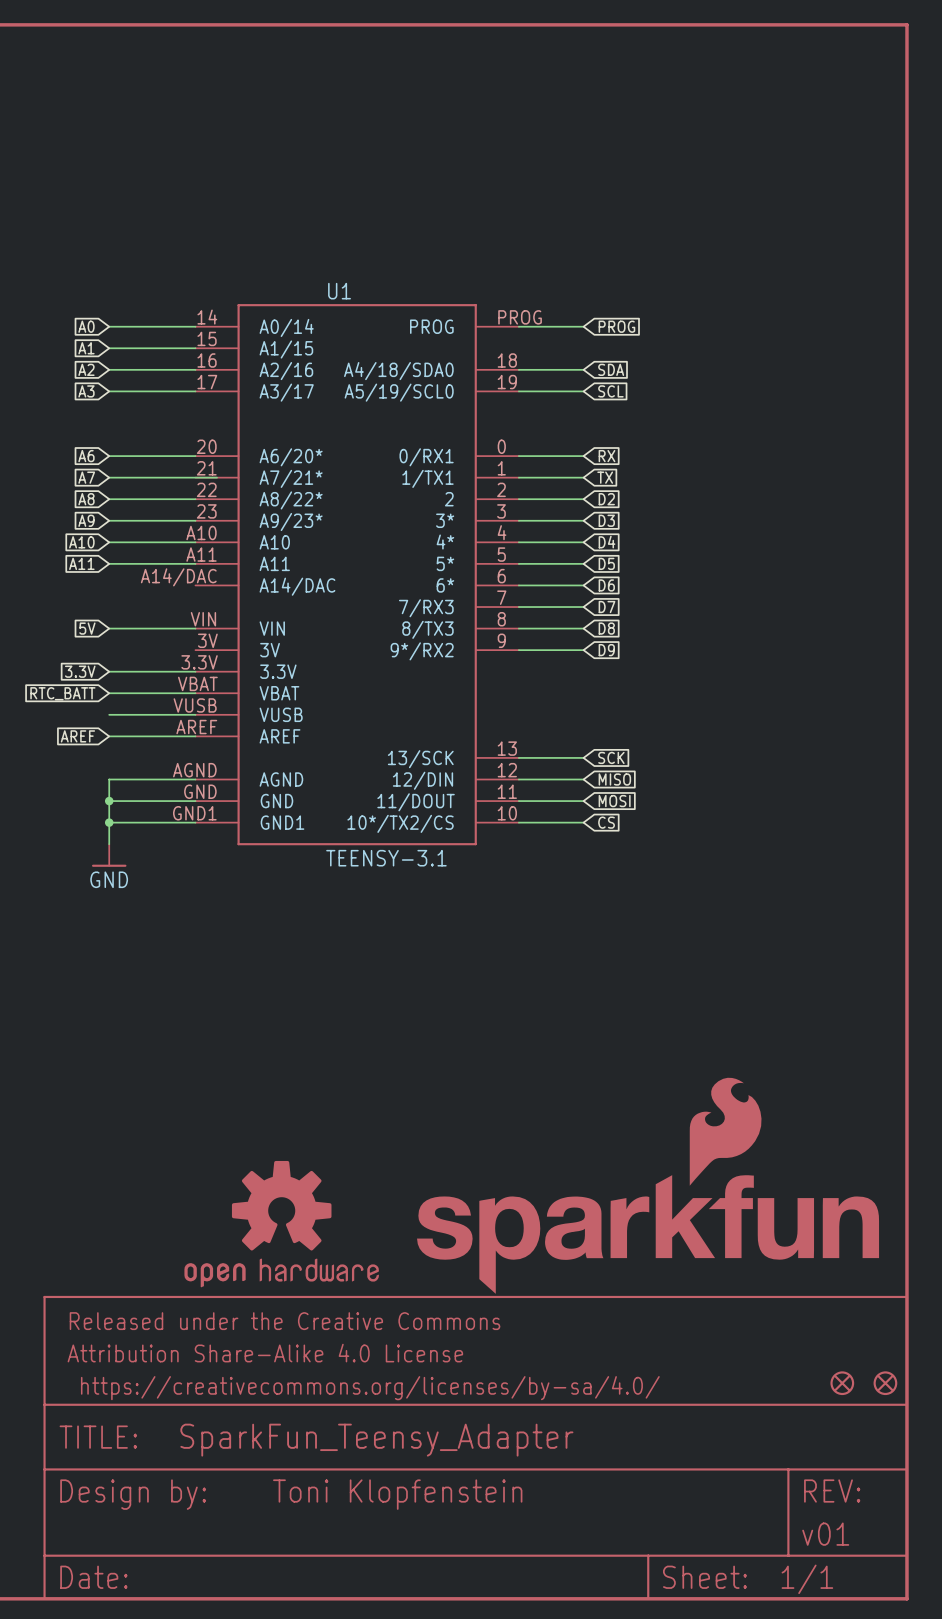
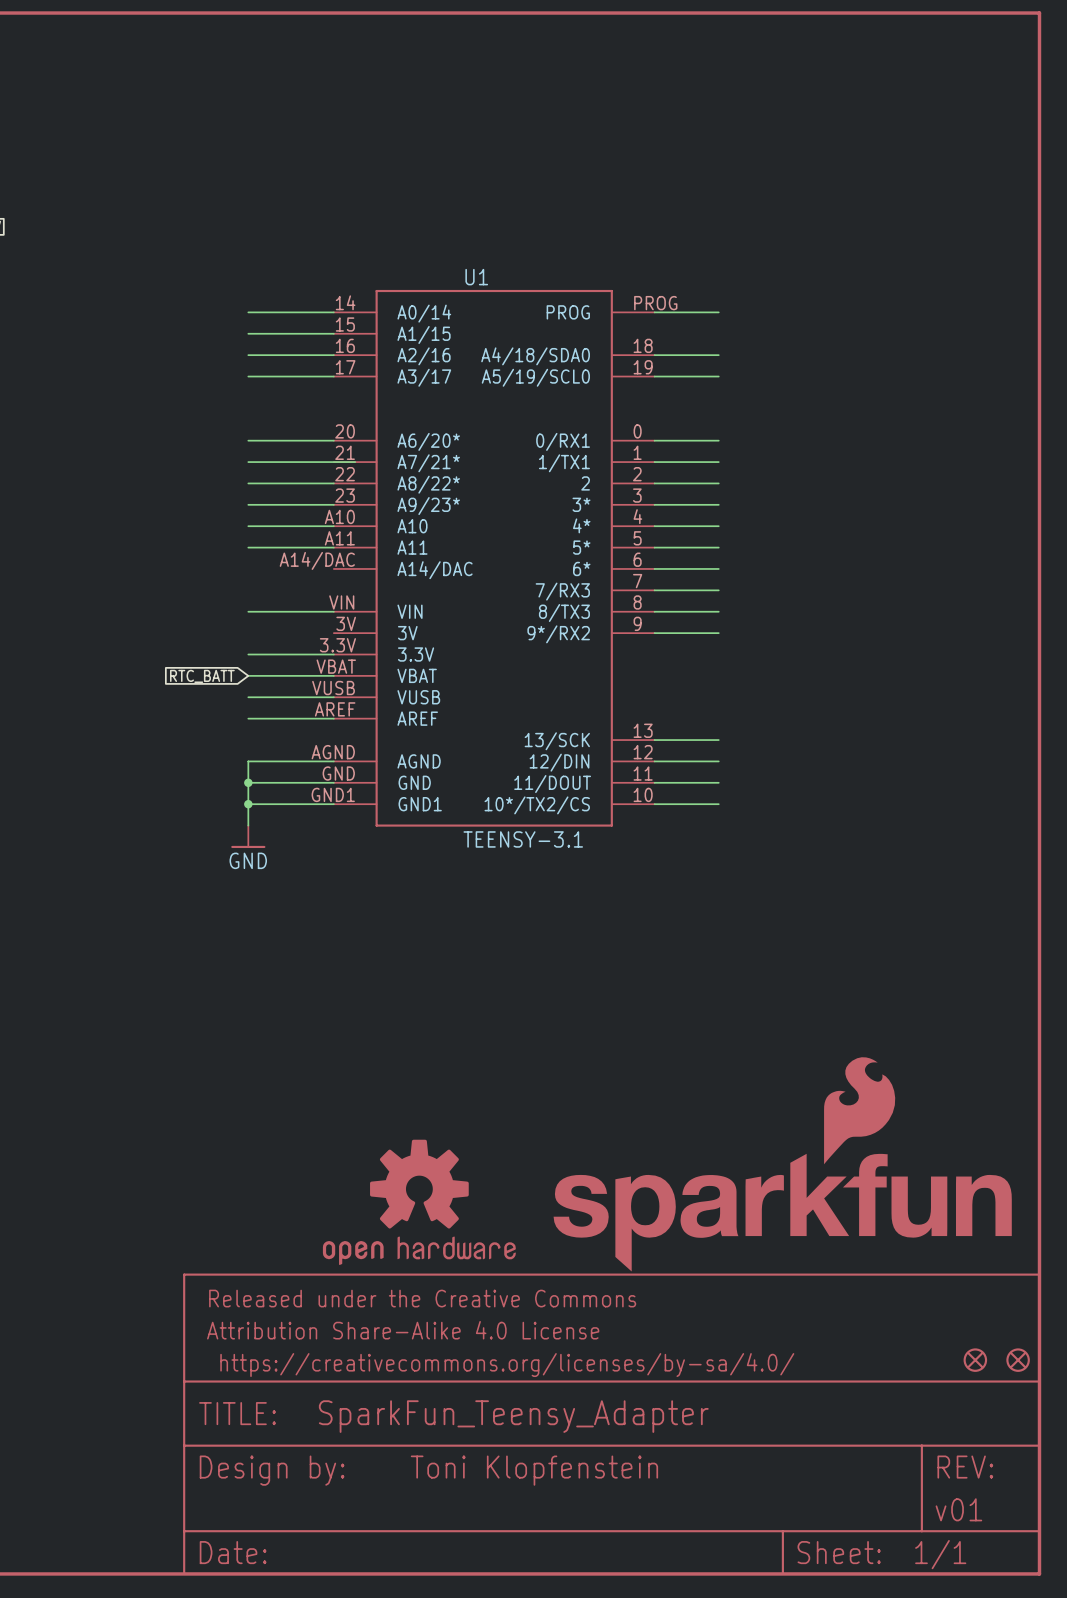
global label: A0 (86, 326) -> none
global label: PROG (616, 326) -> none
global label: A1 (86, 348) -> none
global label: A2 (86, 369) -> none
global label: SDA (611, 369) -> none
global label: A3 (86, 391) -> none
global label: SCL (610, 391) -> none
global label: A6 (86, 456) -> none
global label: RX (607, 456) -> none
global label: A7 (86, 477) -> none
global label: TX (605, 477) -> none
global label: A8 (86, 499) -> none
global label: D2 (606, 499) -> none
global label: A9 (86, 520) -> none
global label: D3 (606, 520) -> none
global label: A10 (81, 542) -> none
global label: D4 (607, 542) -> none
global label: A11 (81, 563) -> none
global label: D5 (606, 563) -> none
global label: D6 (606, 585) -> none
global label: D7 (607, 607) -> none
global label: 5V (87, 628) -> none
global label: D8 (606, 628) -> none
global label: D9 (606, 650) -> none
global label: 3.3V (80, 671) -> none
global label: AREF (77, 736) -> none
global label: SCK (611, 757) -> none
global label: MISO (614, 779) -> none
global label: MOSI (614, 801) -> none
global label: CS (606, 822) -> none

